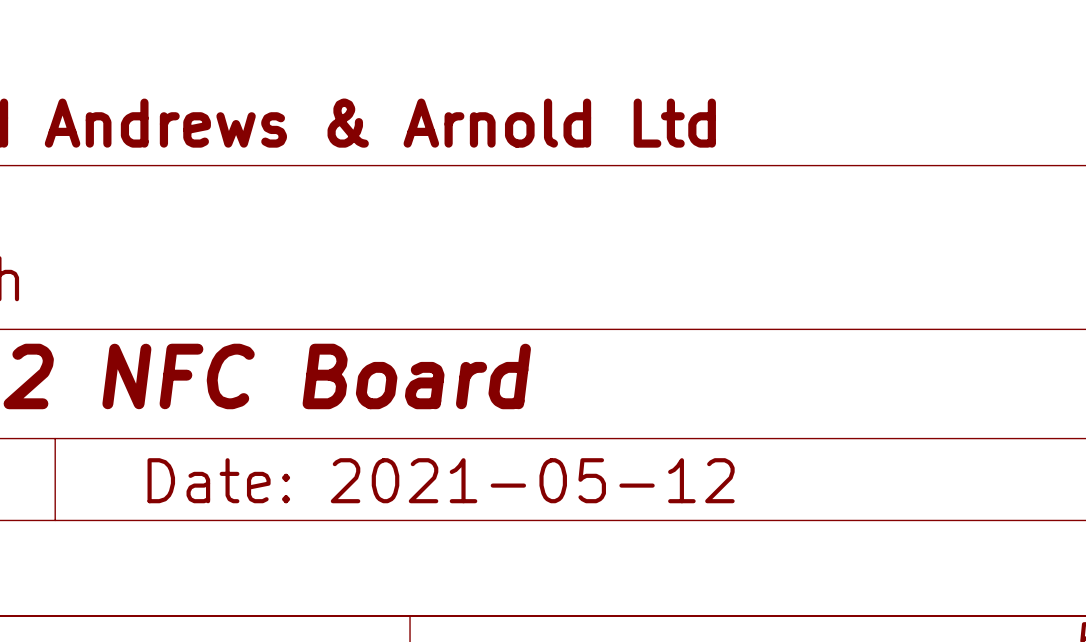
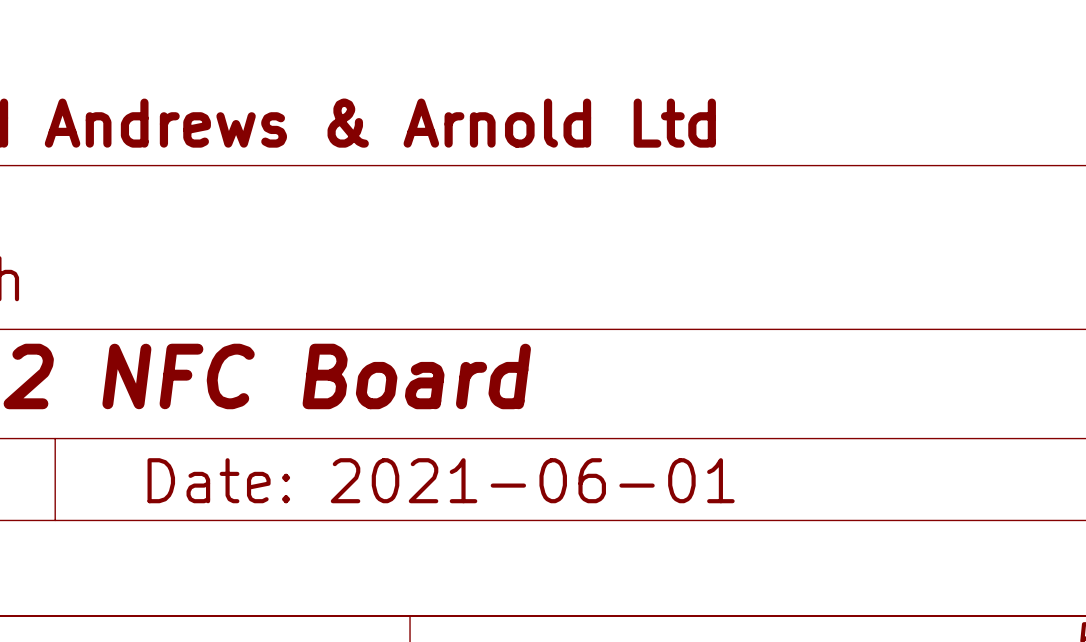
title block: Date: 2021-05-12 (441, 480) -> Date: 2021-06-01 (441, 480)

